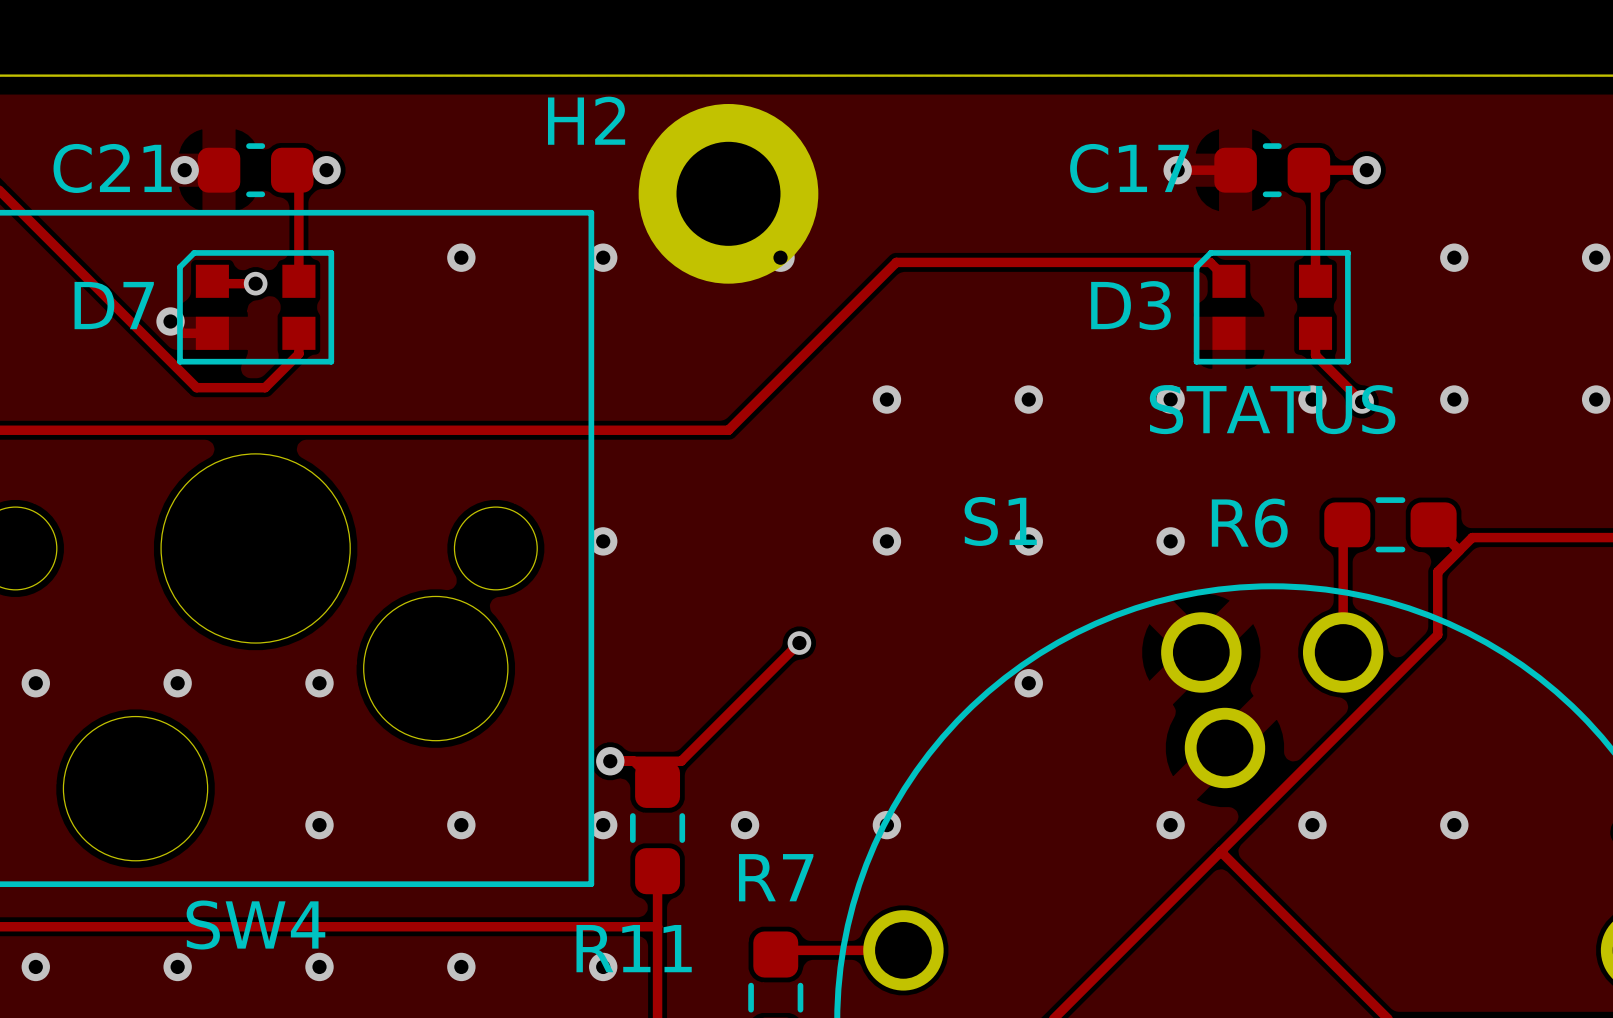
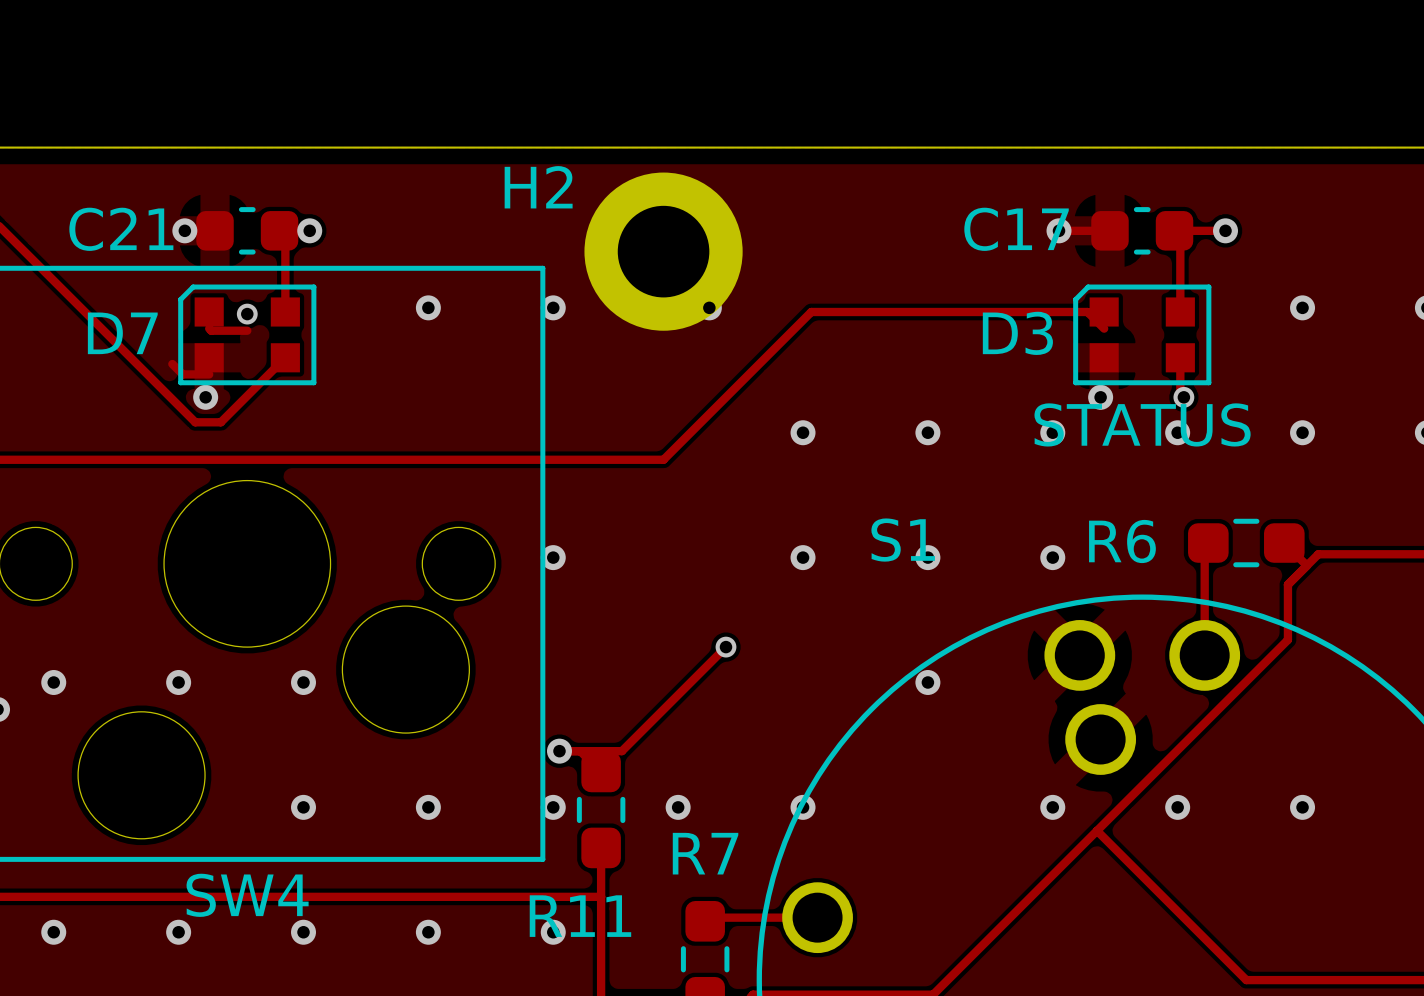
via position: (255, 283) -> (247, 314)
D7 position: (255, 307) -> (247, 334)
D3 position: (1272, 307) -> (1142, 334)
via position: (170, 321) -> (205, 397)
track: (298, 333) (298, 353) (265, 387) (225, 387) -> (285, 357) (220, 422)
via: none -> (1100, 397)
track: (1319, 359) (1362, 401) -> none
via position: (1362, 401) -> (1183, 397)

